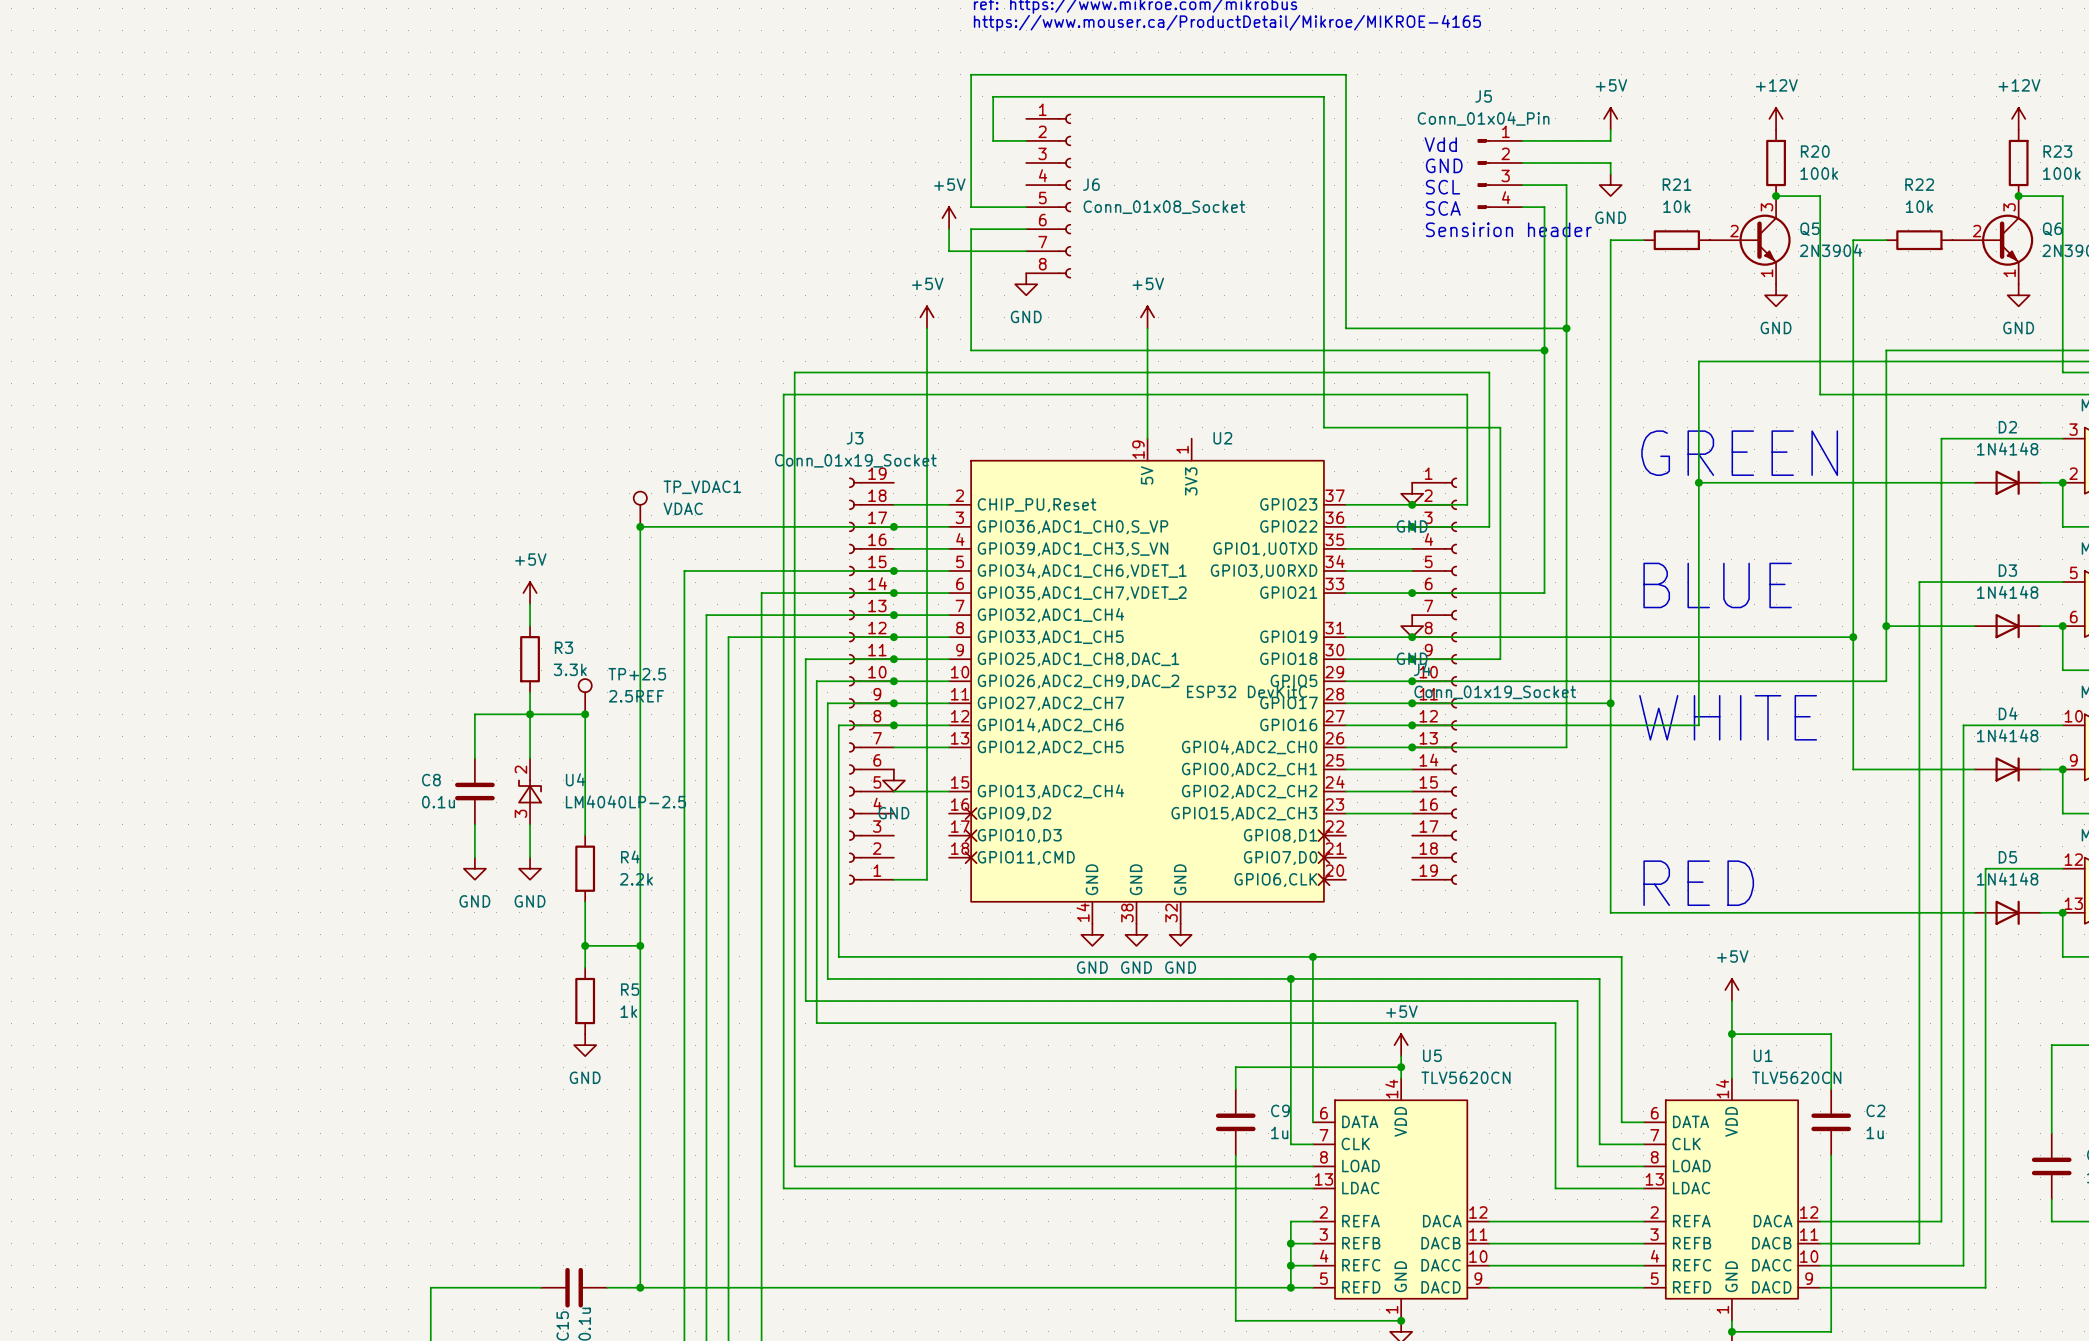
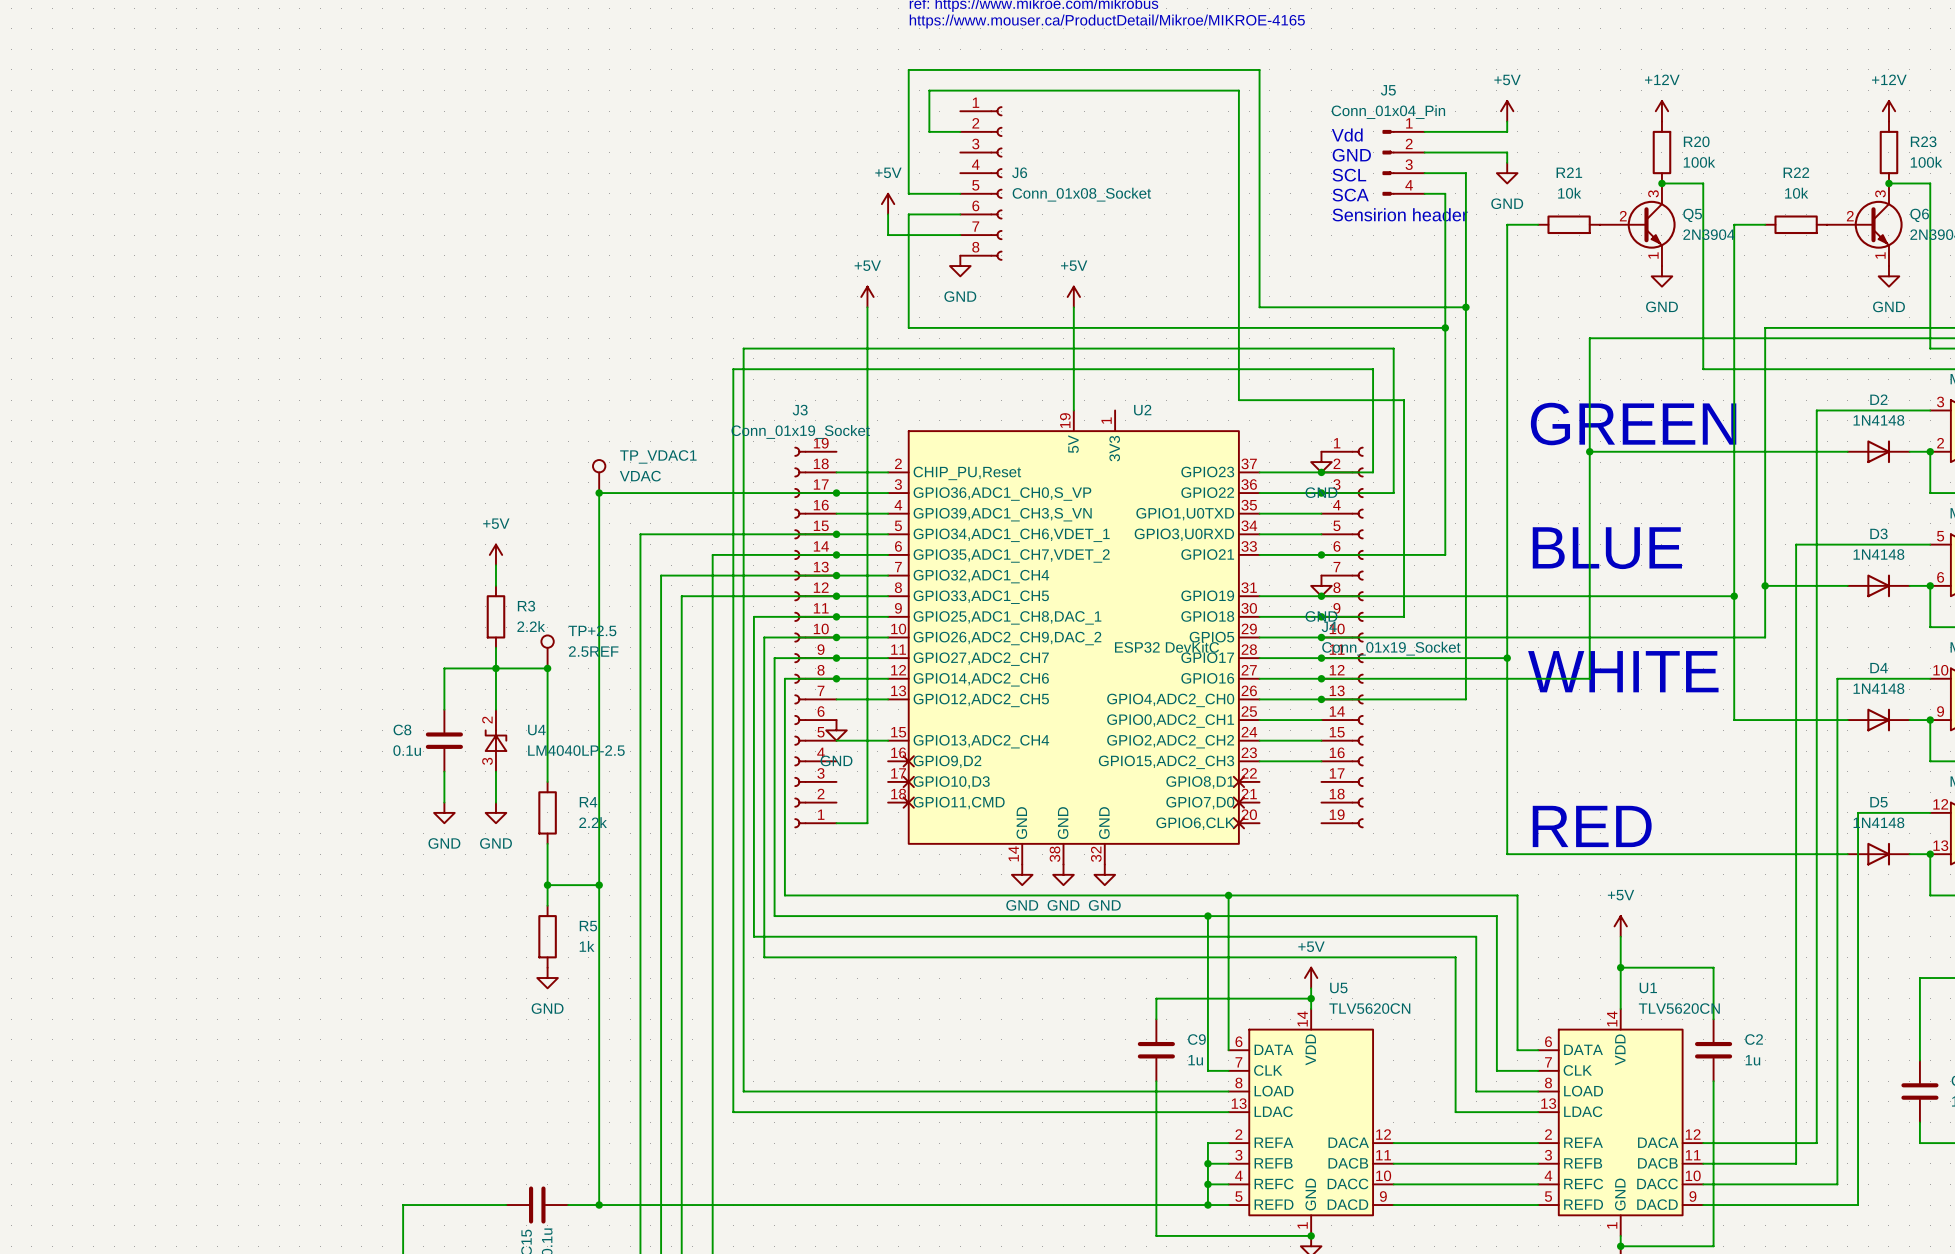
R3 value: 3.3k (570, 669) -> 2.2k (531, 626)

